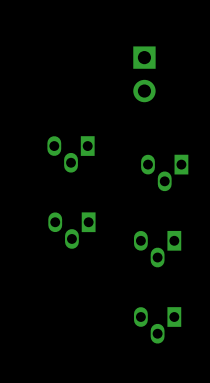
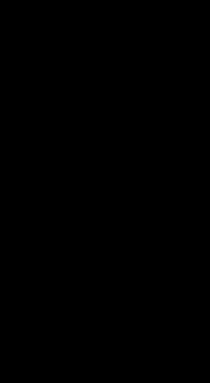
part: (144, 74) -> none
part: (71, 154) -> none
part: (164, 172) -> none
part: (71, 230) -> none
part: (157, 249) -> none
part: (157, 325) -> none

